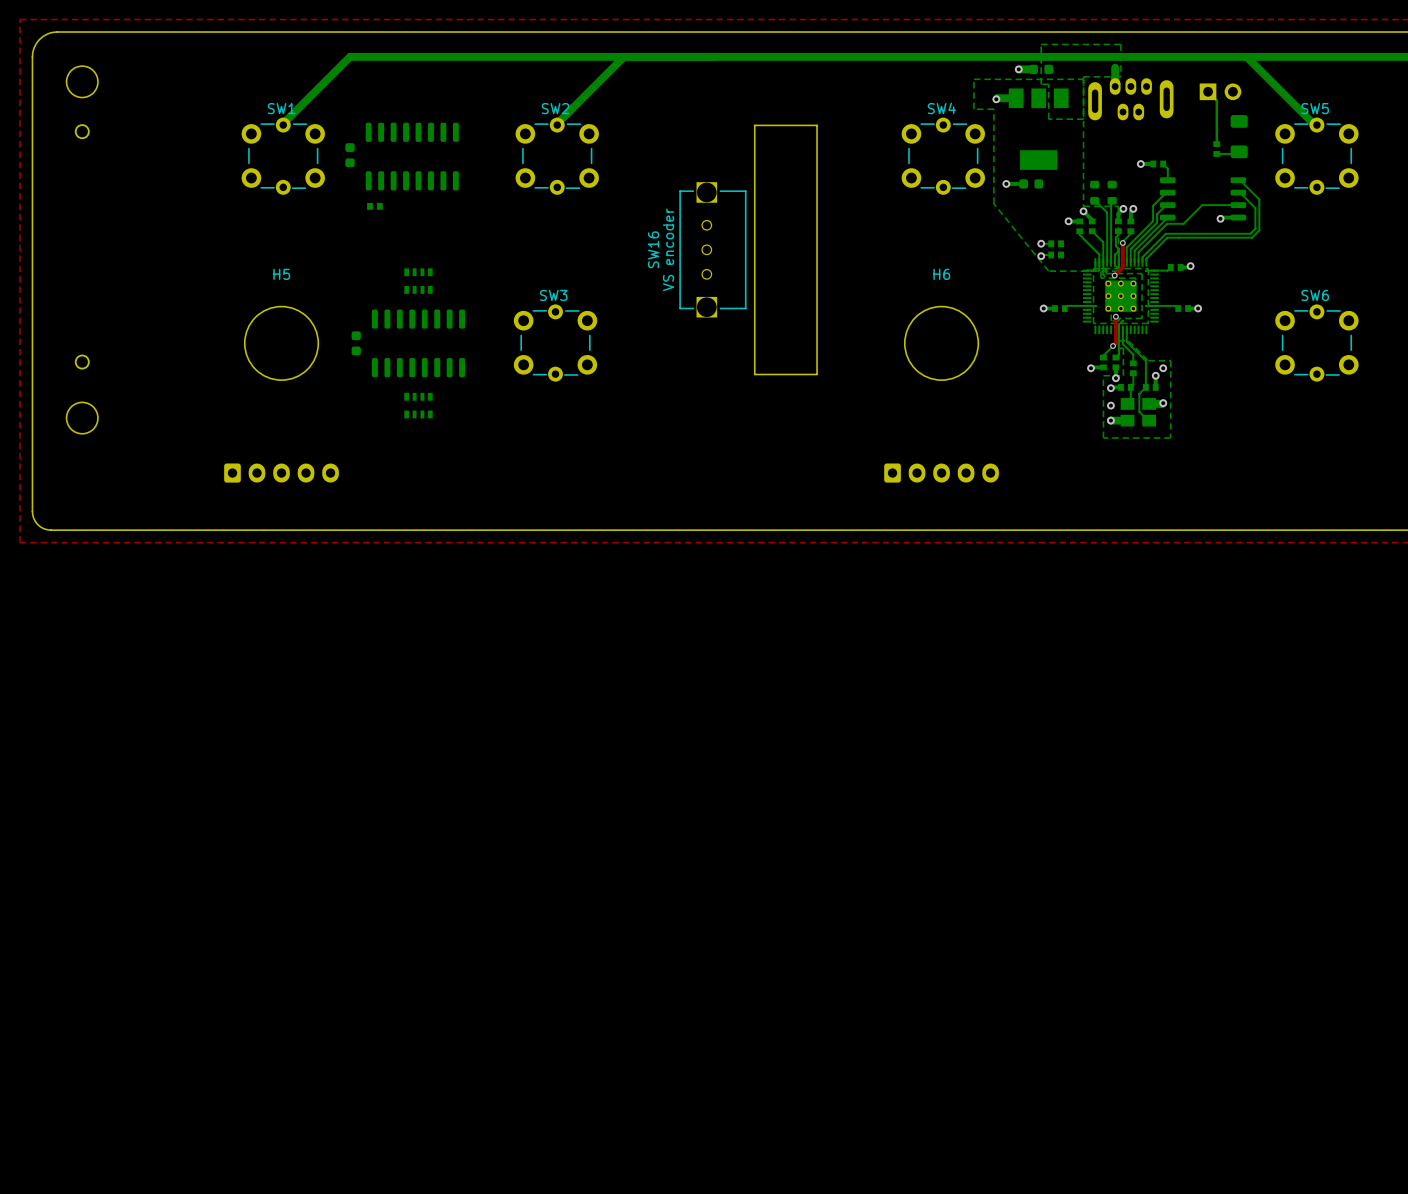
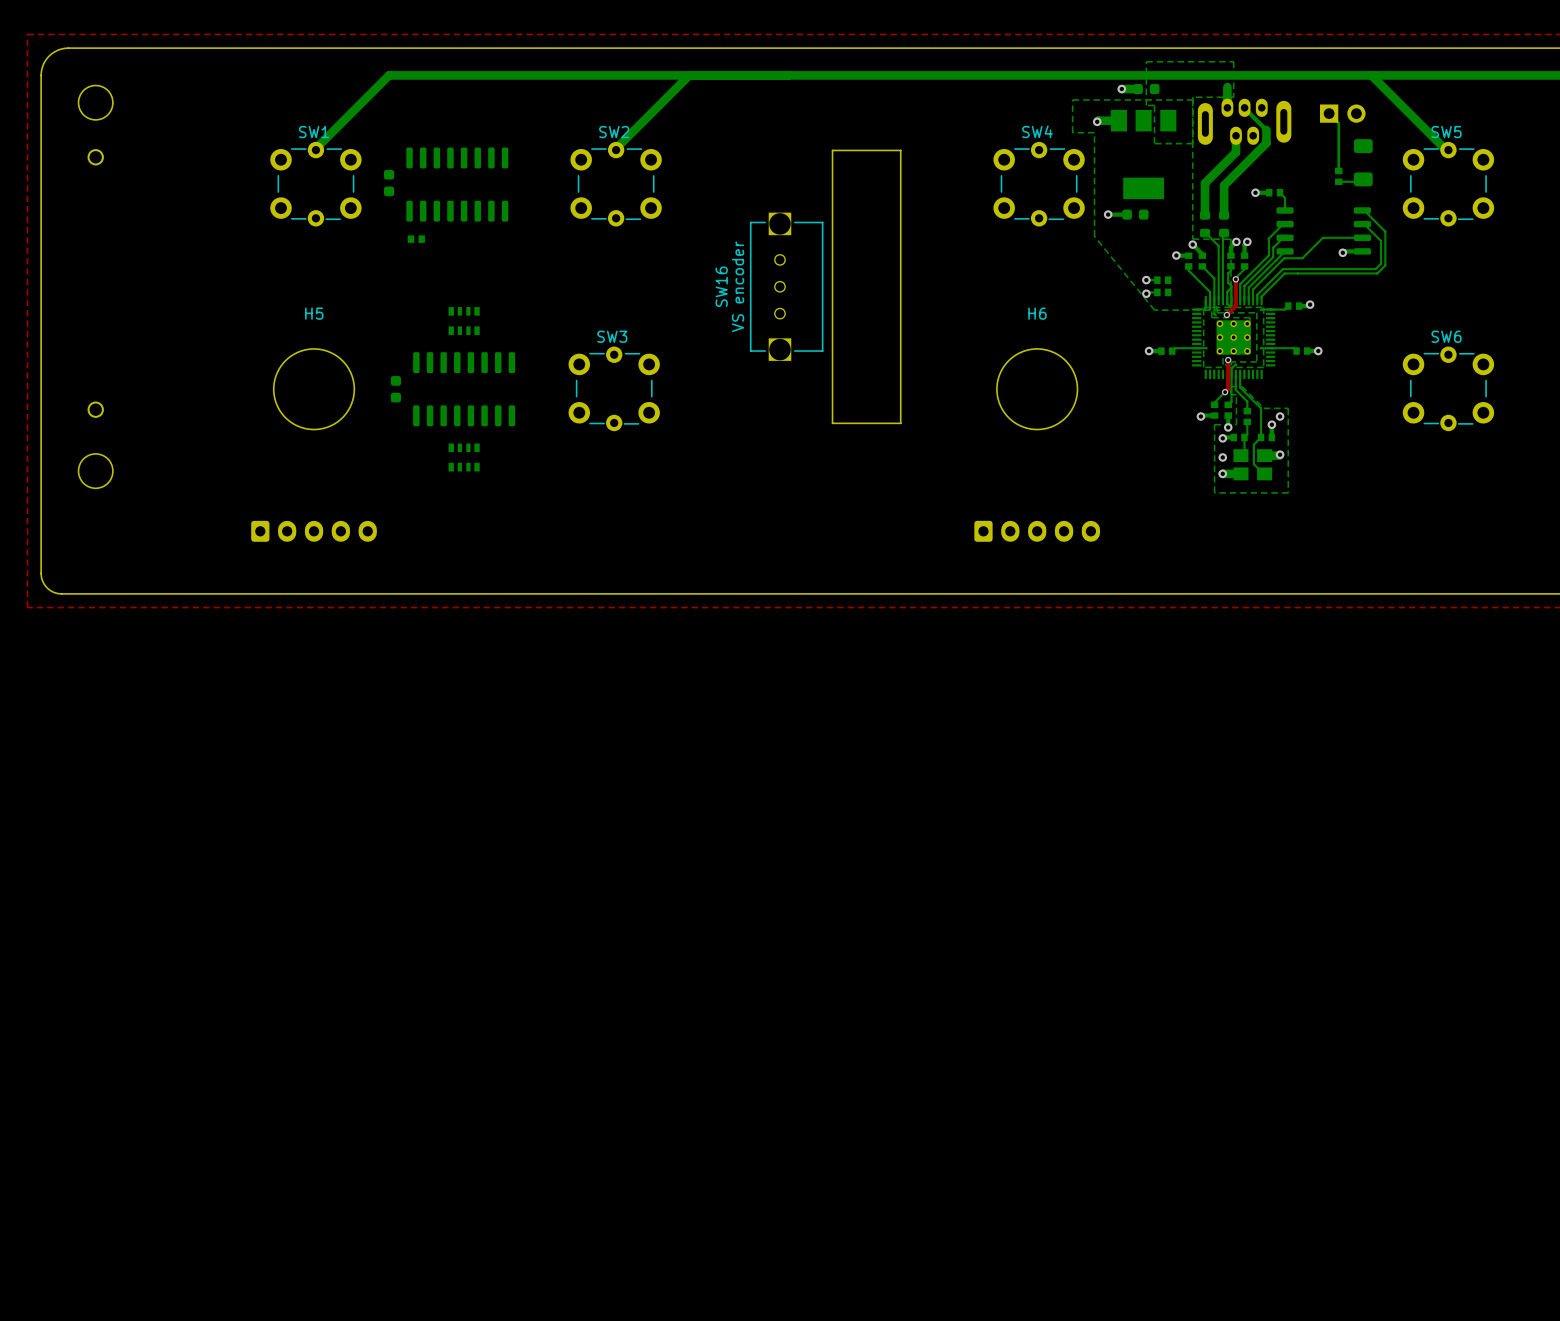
bottom track: none -> (1244, 107) (1266, 129)
bottom track: none -> (1266, 129) (1266, 143) (1224, 185) (1224, 215)
bottom track: none -> (1236, 135) (1236, 152) (1205, 183) (1205, 215)

